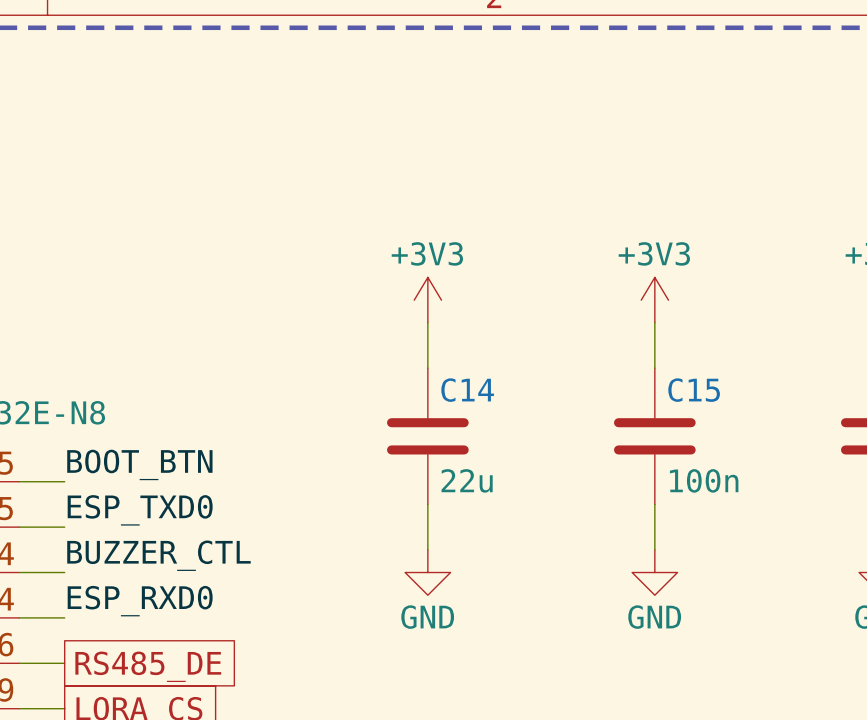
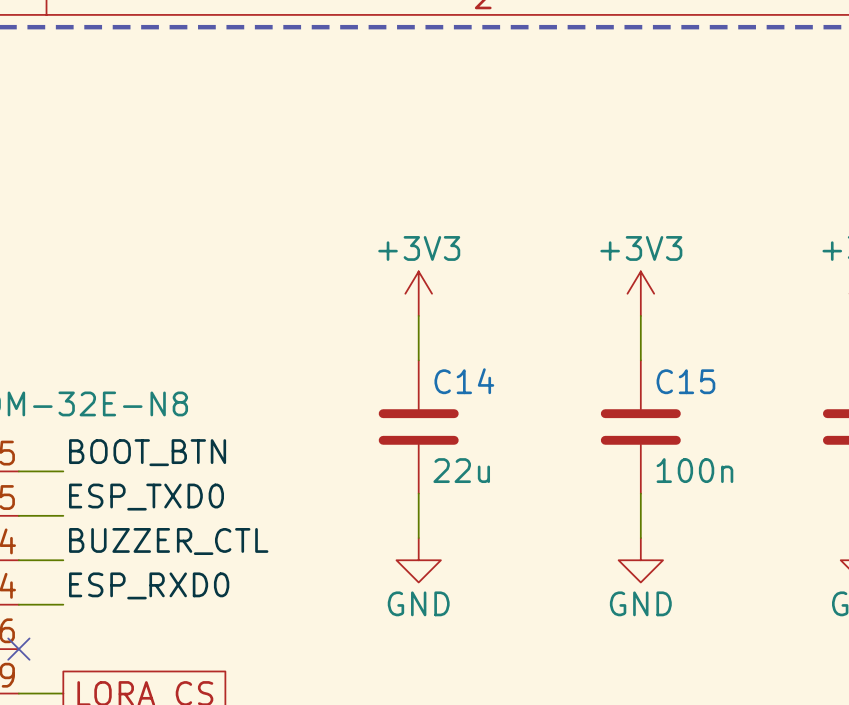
wire: (19, 663) (64, 663) -> none
no-connect mark: none -> (18, 649)
global label: RS485_DE (148, 666) -> none

